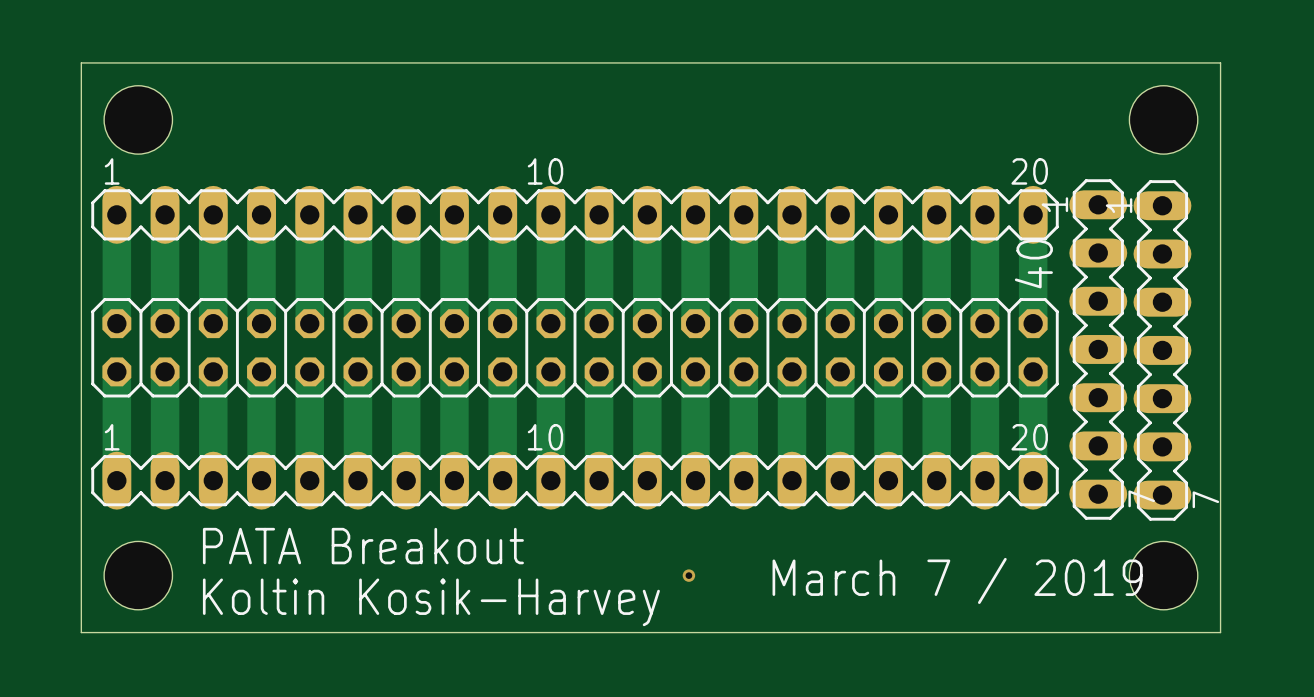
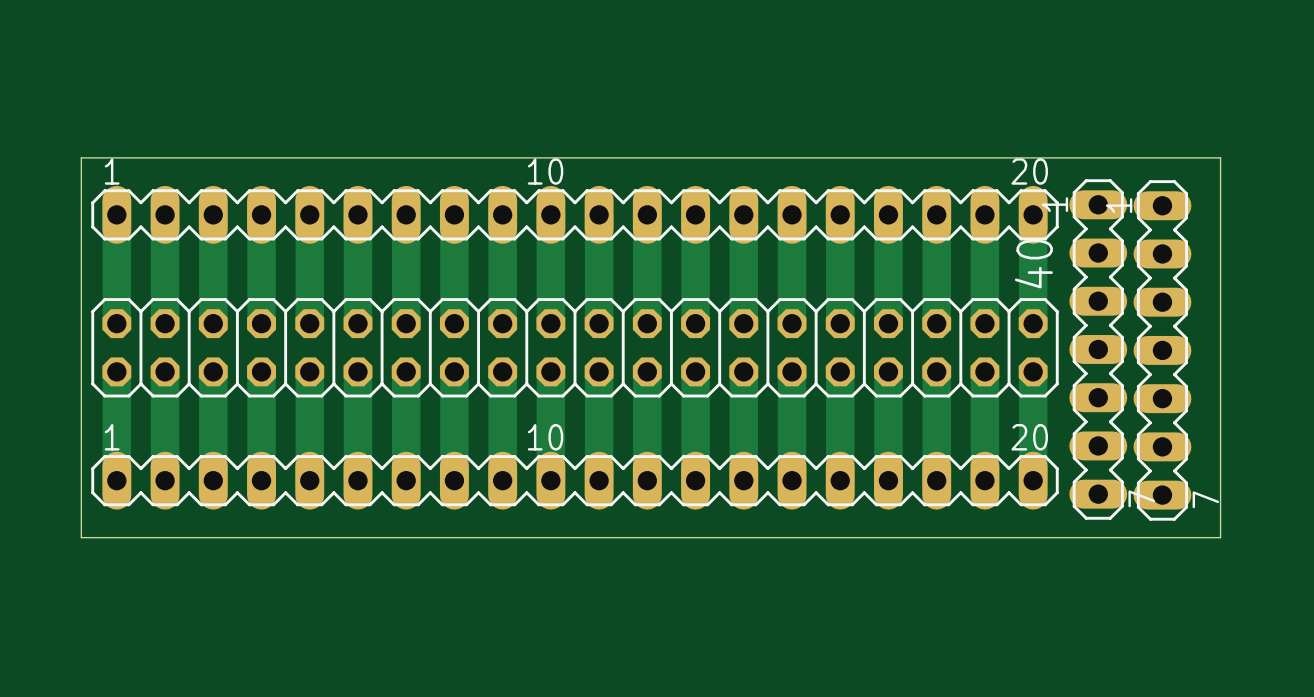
hole: (138, 119) -> none
hole: (1163, 119) -> none
board edge: (81, 157) (81, 62) (1220, 62) (1220, 157) -> (81, 157) (1220, 157)
board edge: (81, 537) (81, 632) (1220, 632) (1220, 537) -> (81, 537) (1220, 537)
text: PATA Breakout (363, 546) -> none
hole: (138, 575) -> none
via: (688, 575) -> none
hole: (1163, 575) -> none
text: March 7 / 2019 (957, 580) -> none
text: Koltin Kosik-Harvey (431, 602) -> none

